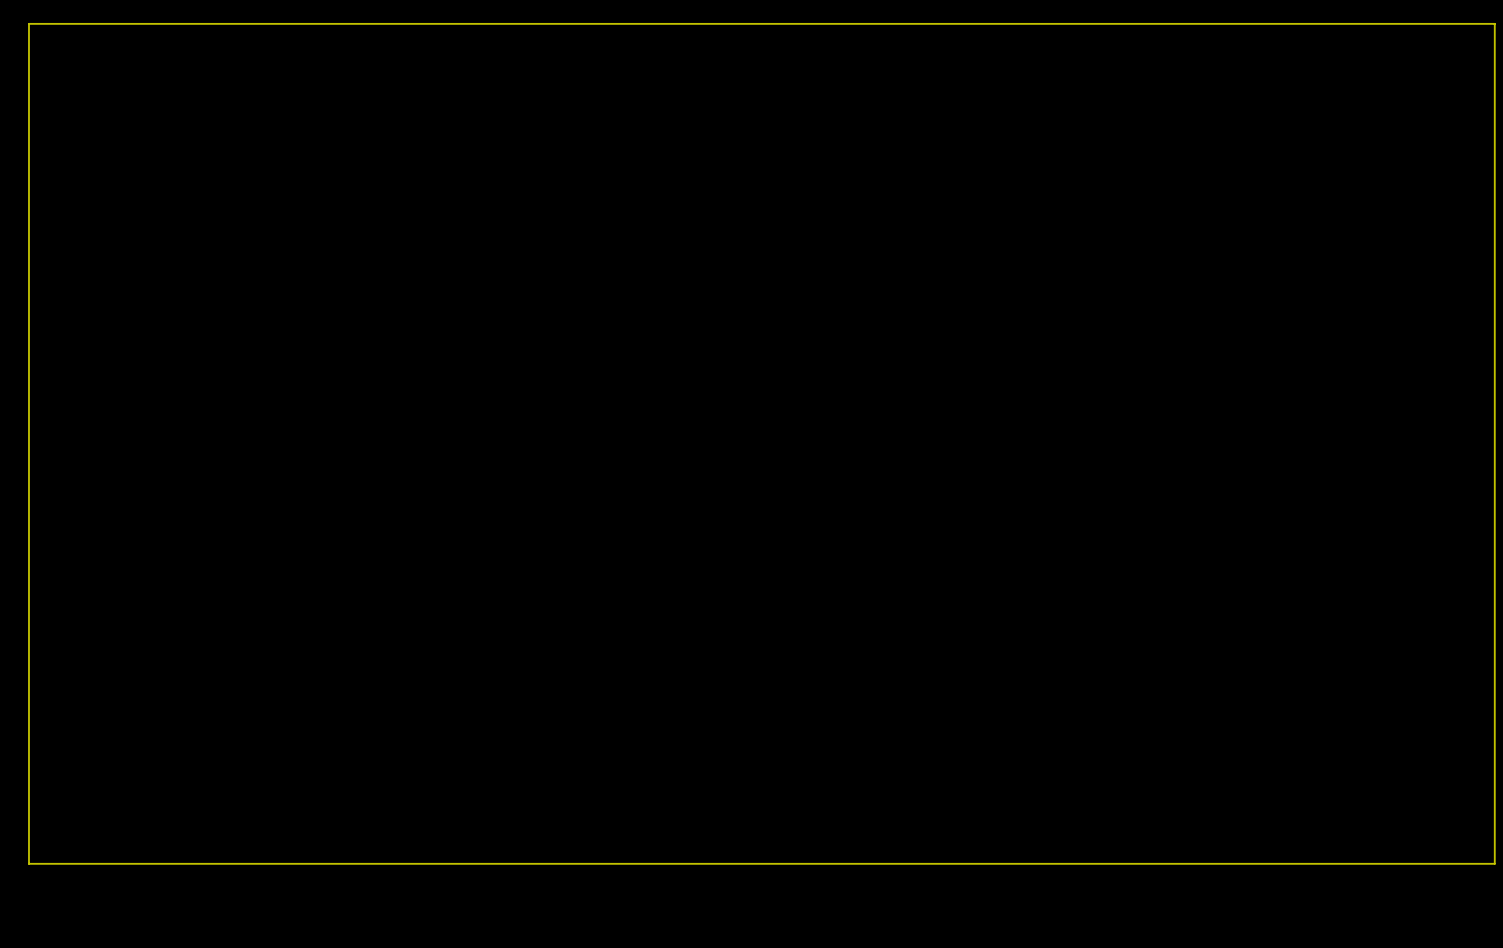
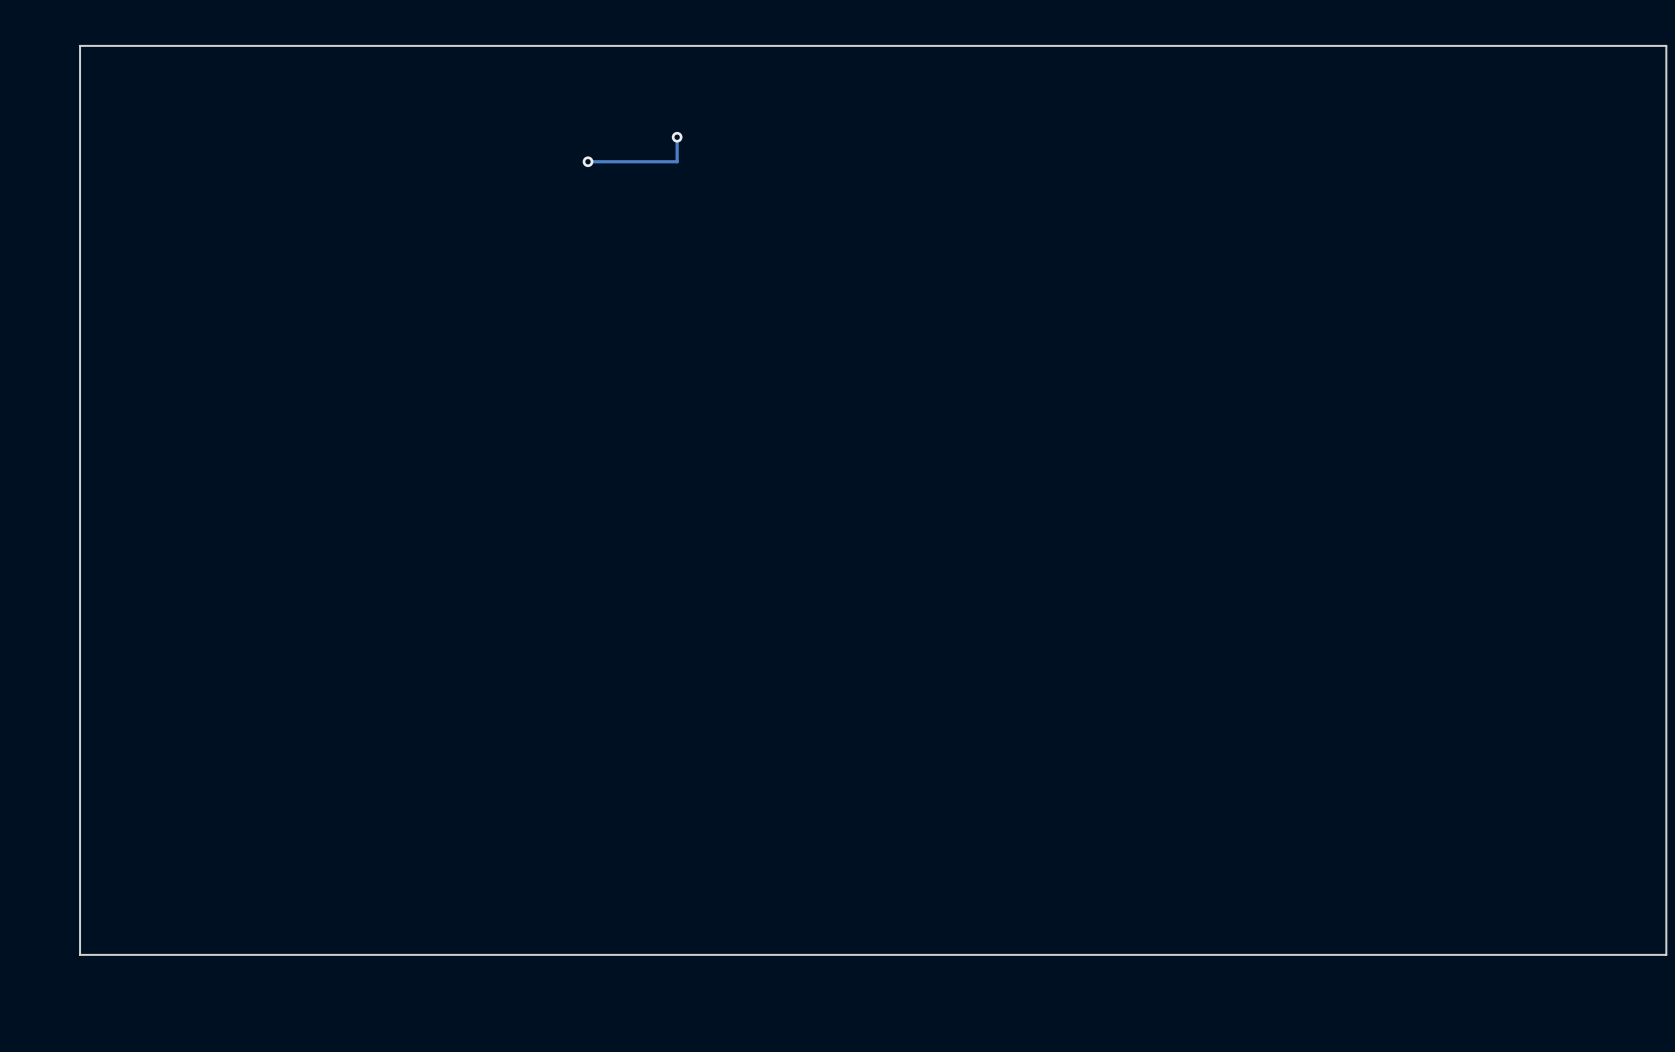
track: none -> (677, 137) (677, 161) (588, 161)
via: none -> (677, 137)
via: none -> (588, 161)

